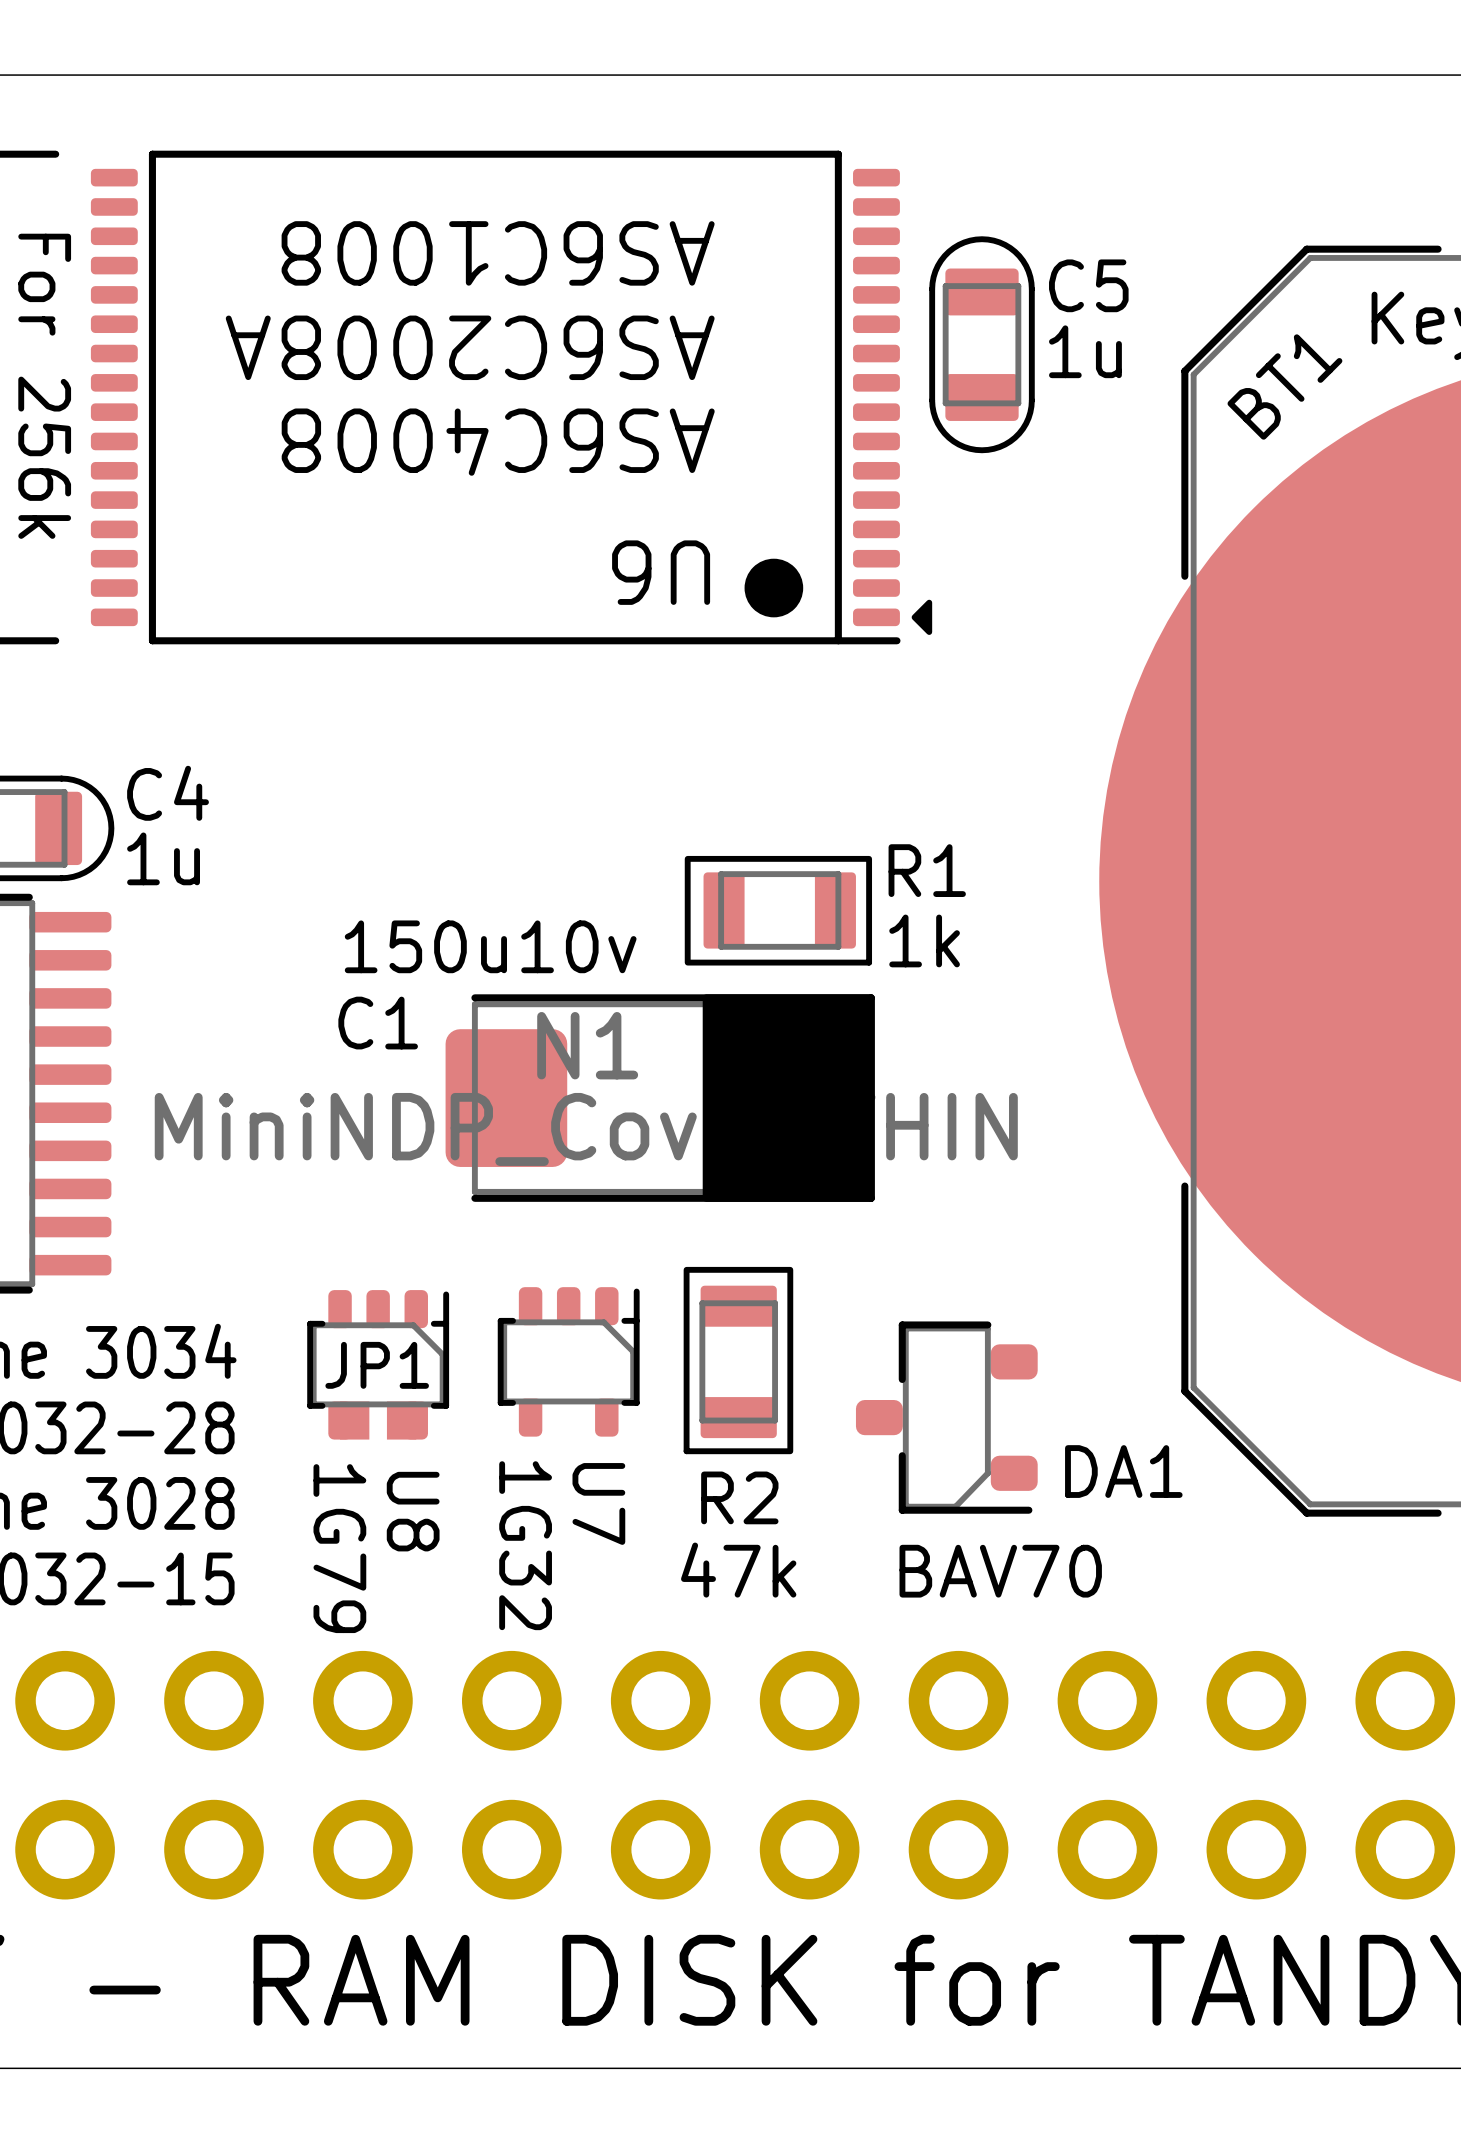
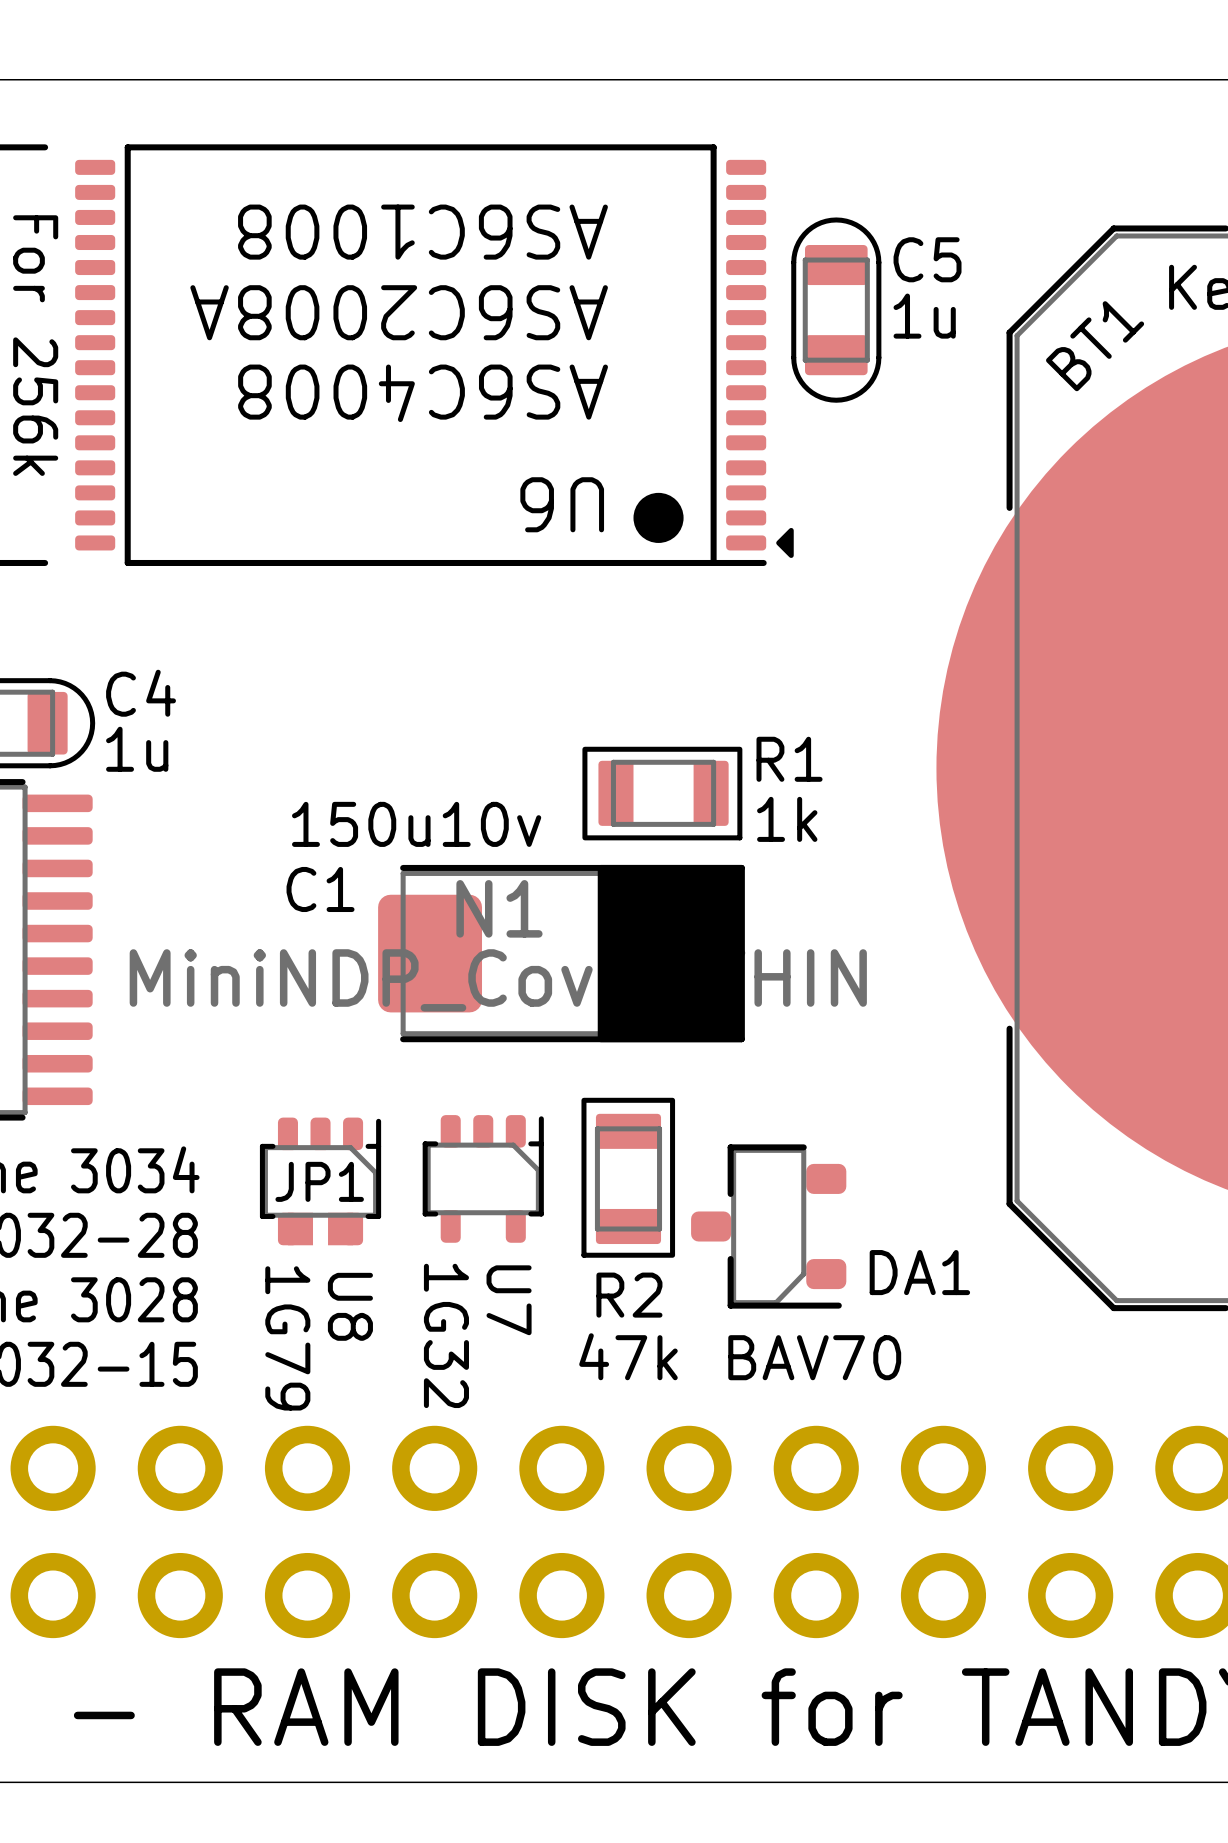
DA1 position: (946, 1417) -> (768, 1226)

